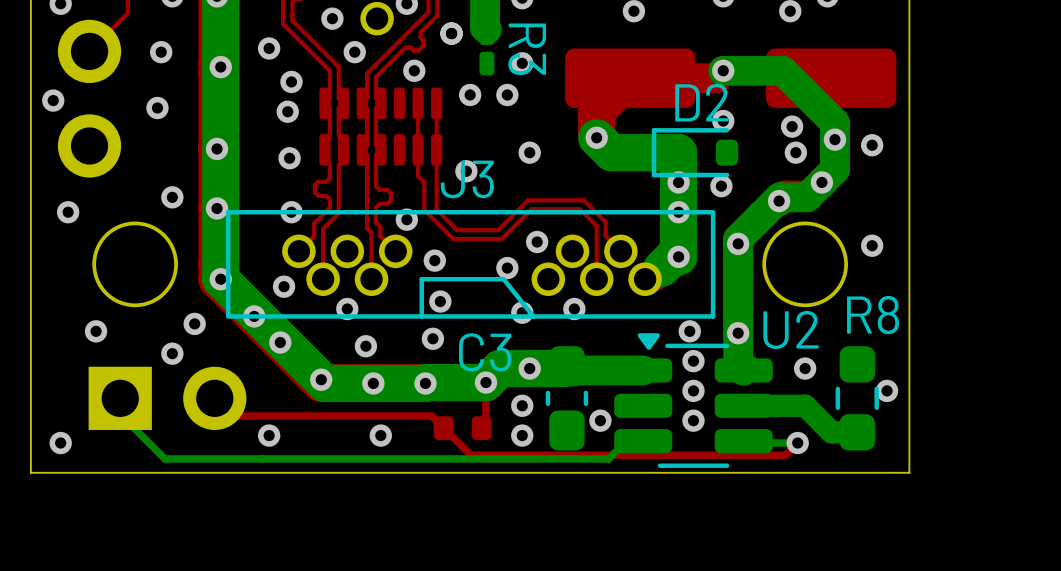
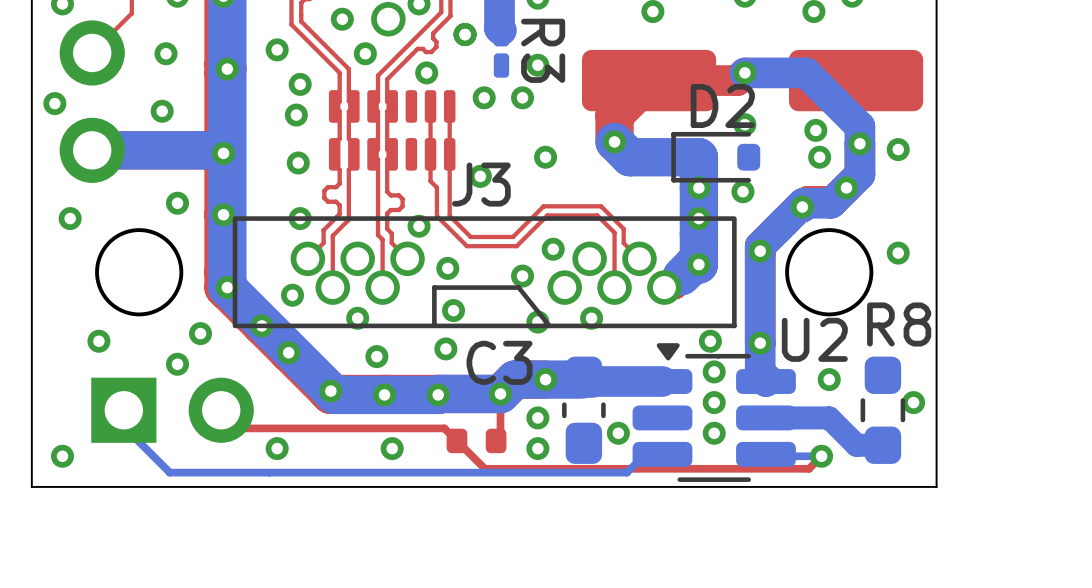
bottom track: none -> (92, 150) (220, 150) (223, 153)

